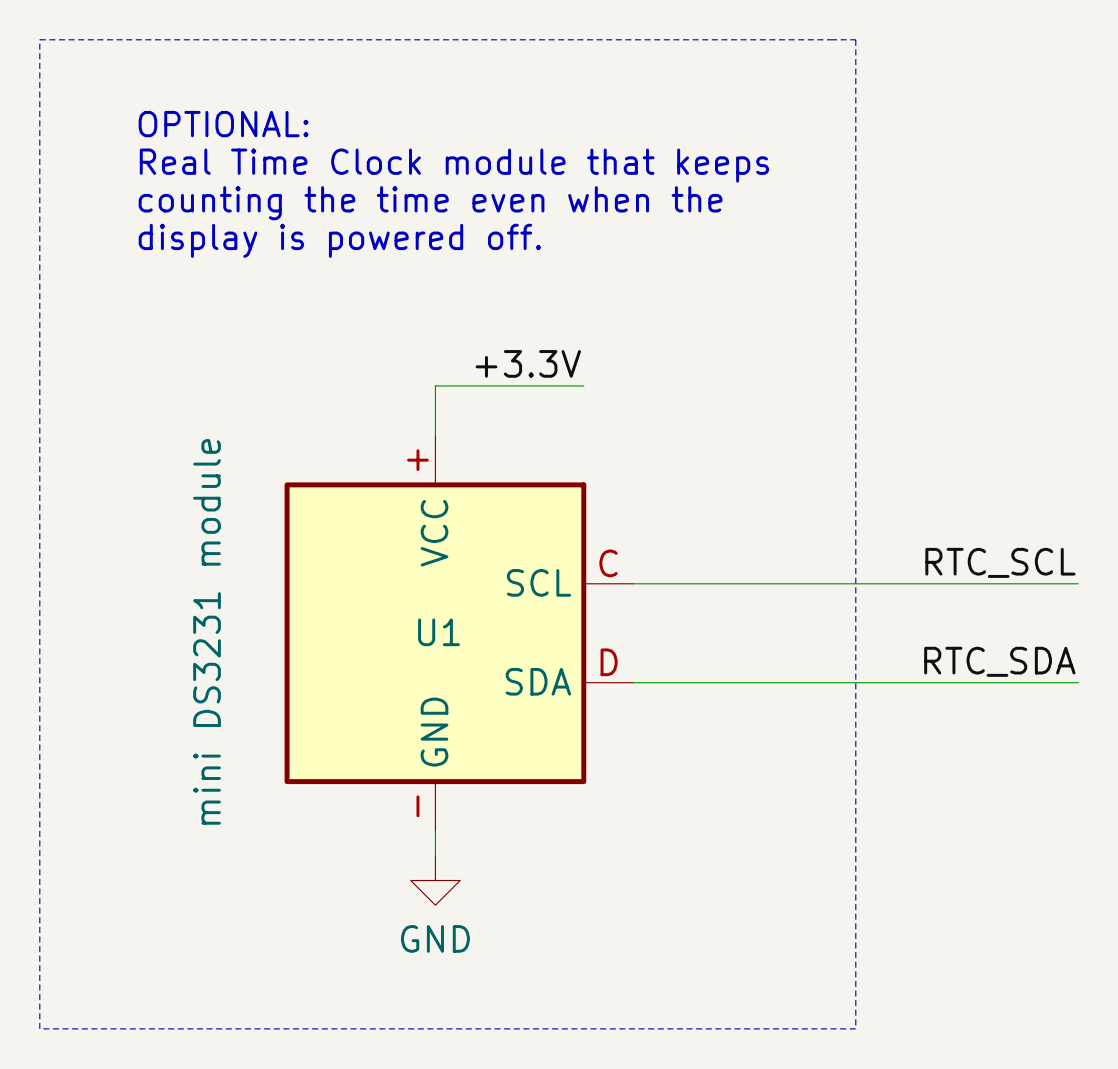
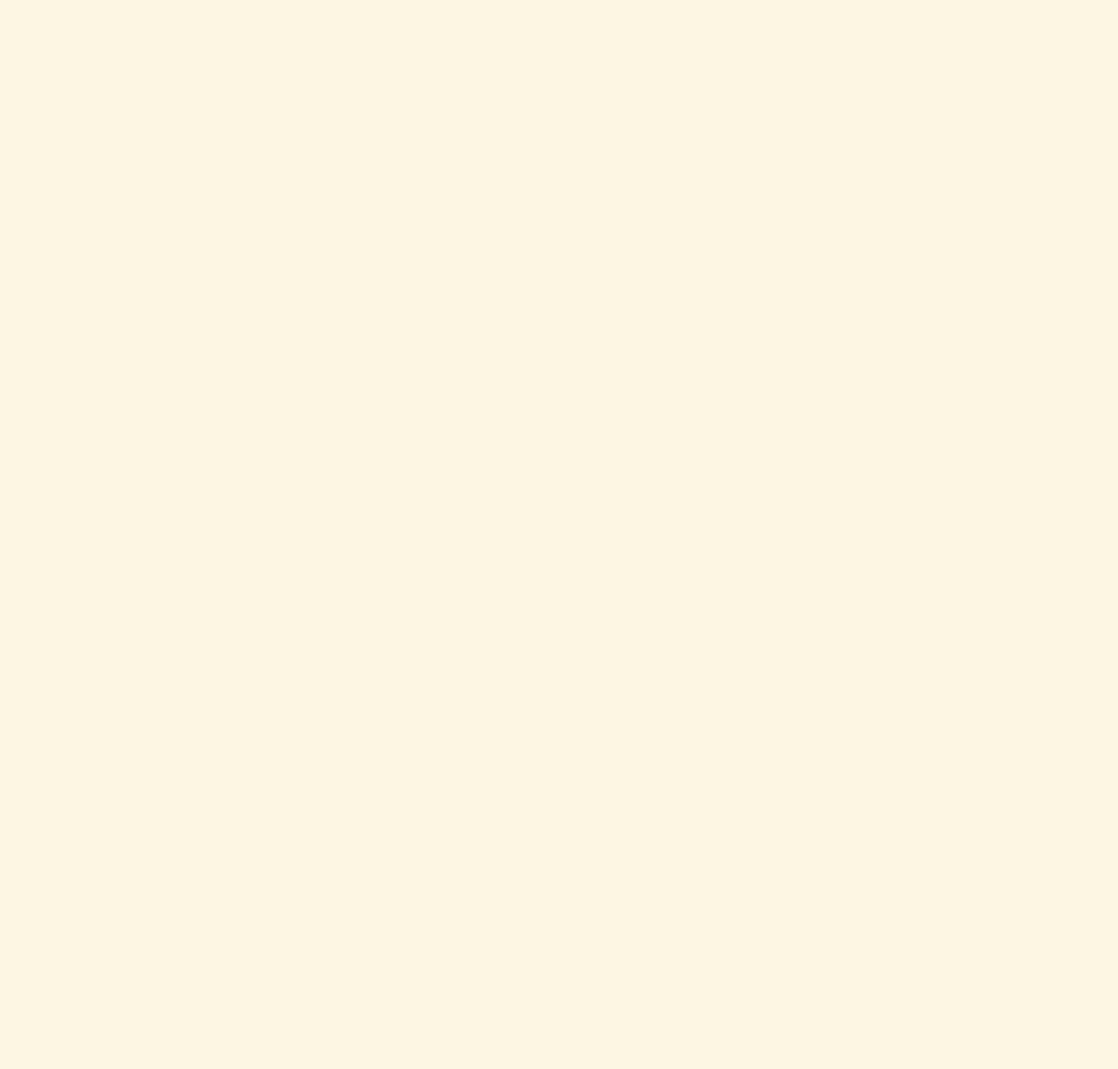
line: (39, 39) (39, 1028) (855, 1028) (855, 39) (39, 39) -> none
text: OPTIONAL: (223, 124) -> none
text: Real Time Clock module that keeps (454, 165) -> none
text: counting the time even when the (430, 203) -> none
text: display is powered off. (339, 240) -> none
label: +3.3V (528, 363) -> none
wire: (583, 385) (435, 385) (435, 435) -> none
label: RTC_SCL (1000, 562) -> none
wire: (633, 583) (1078, 583) -> none
U1: mini DS3231 module (458, 633) -> none
label: RTC_SDA (999, 661) -> none
wire: (633, 682) (1078, 682) -> none
wire: (435, 831) (435, 855) -> none
power symbol: GND (435, 880) -> none

